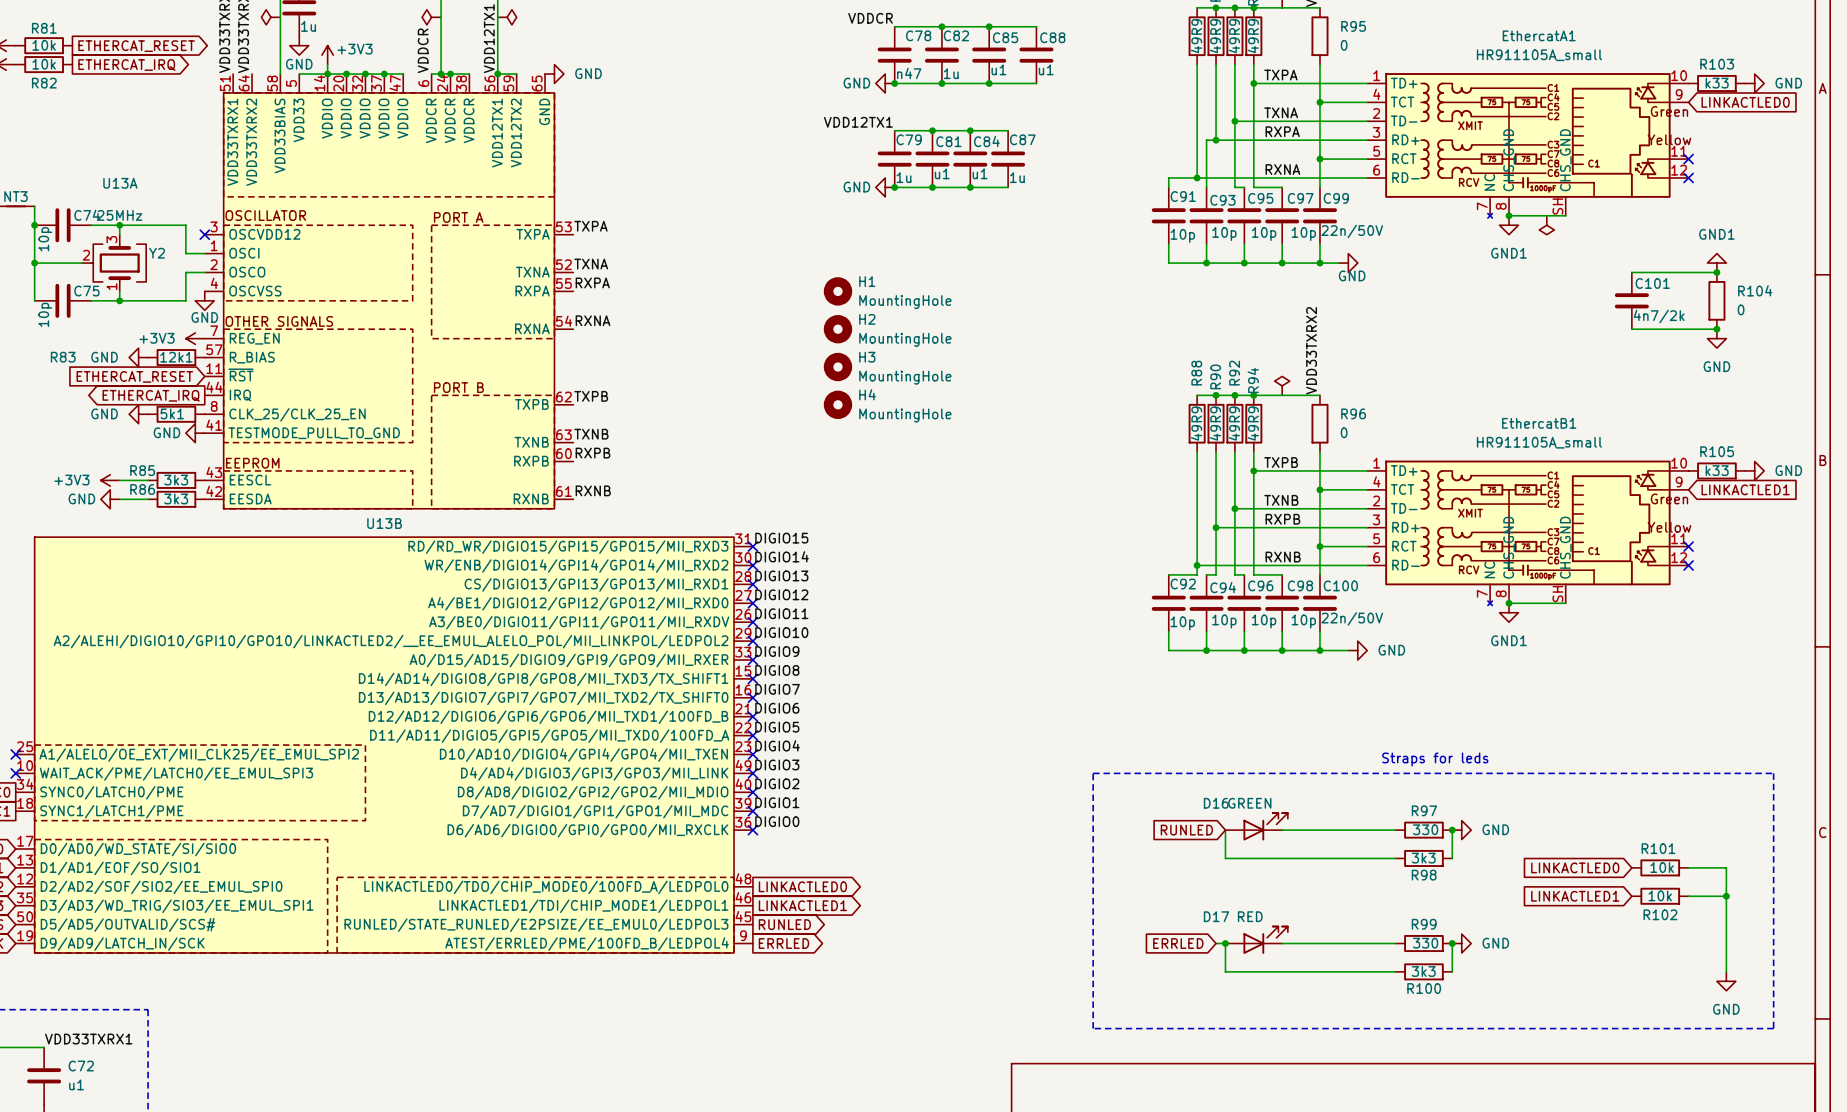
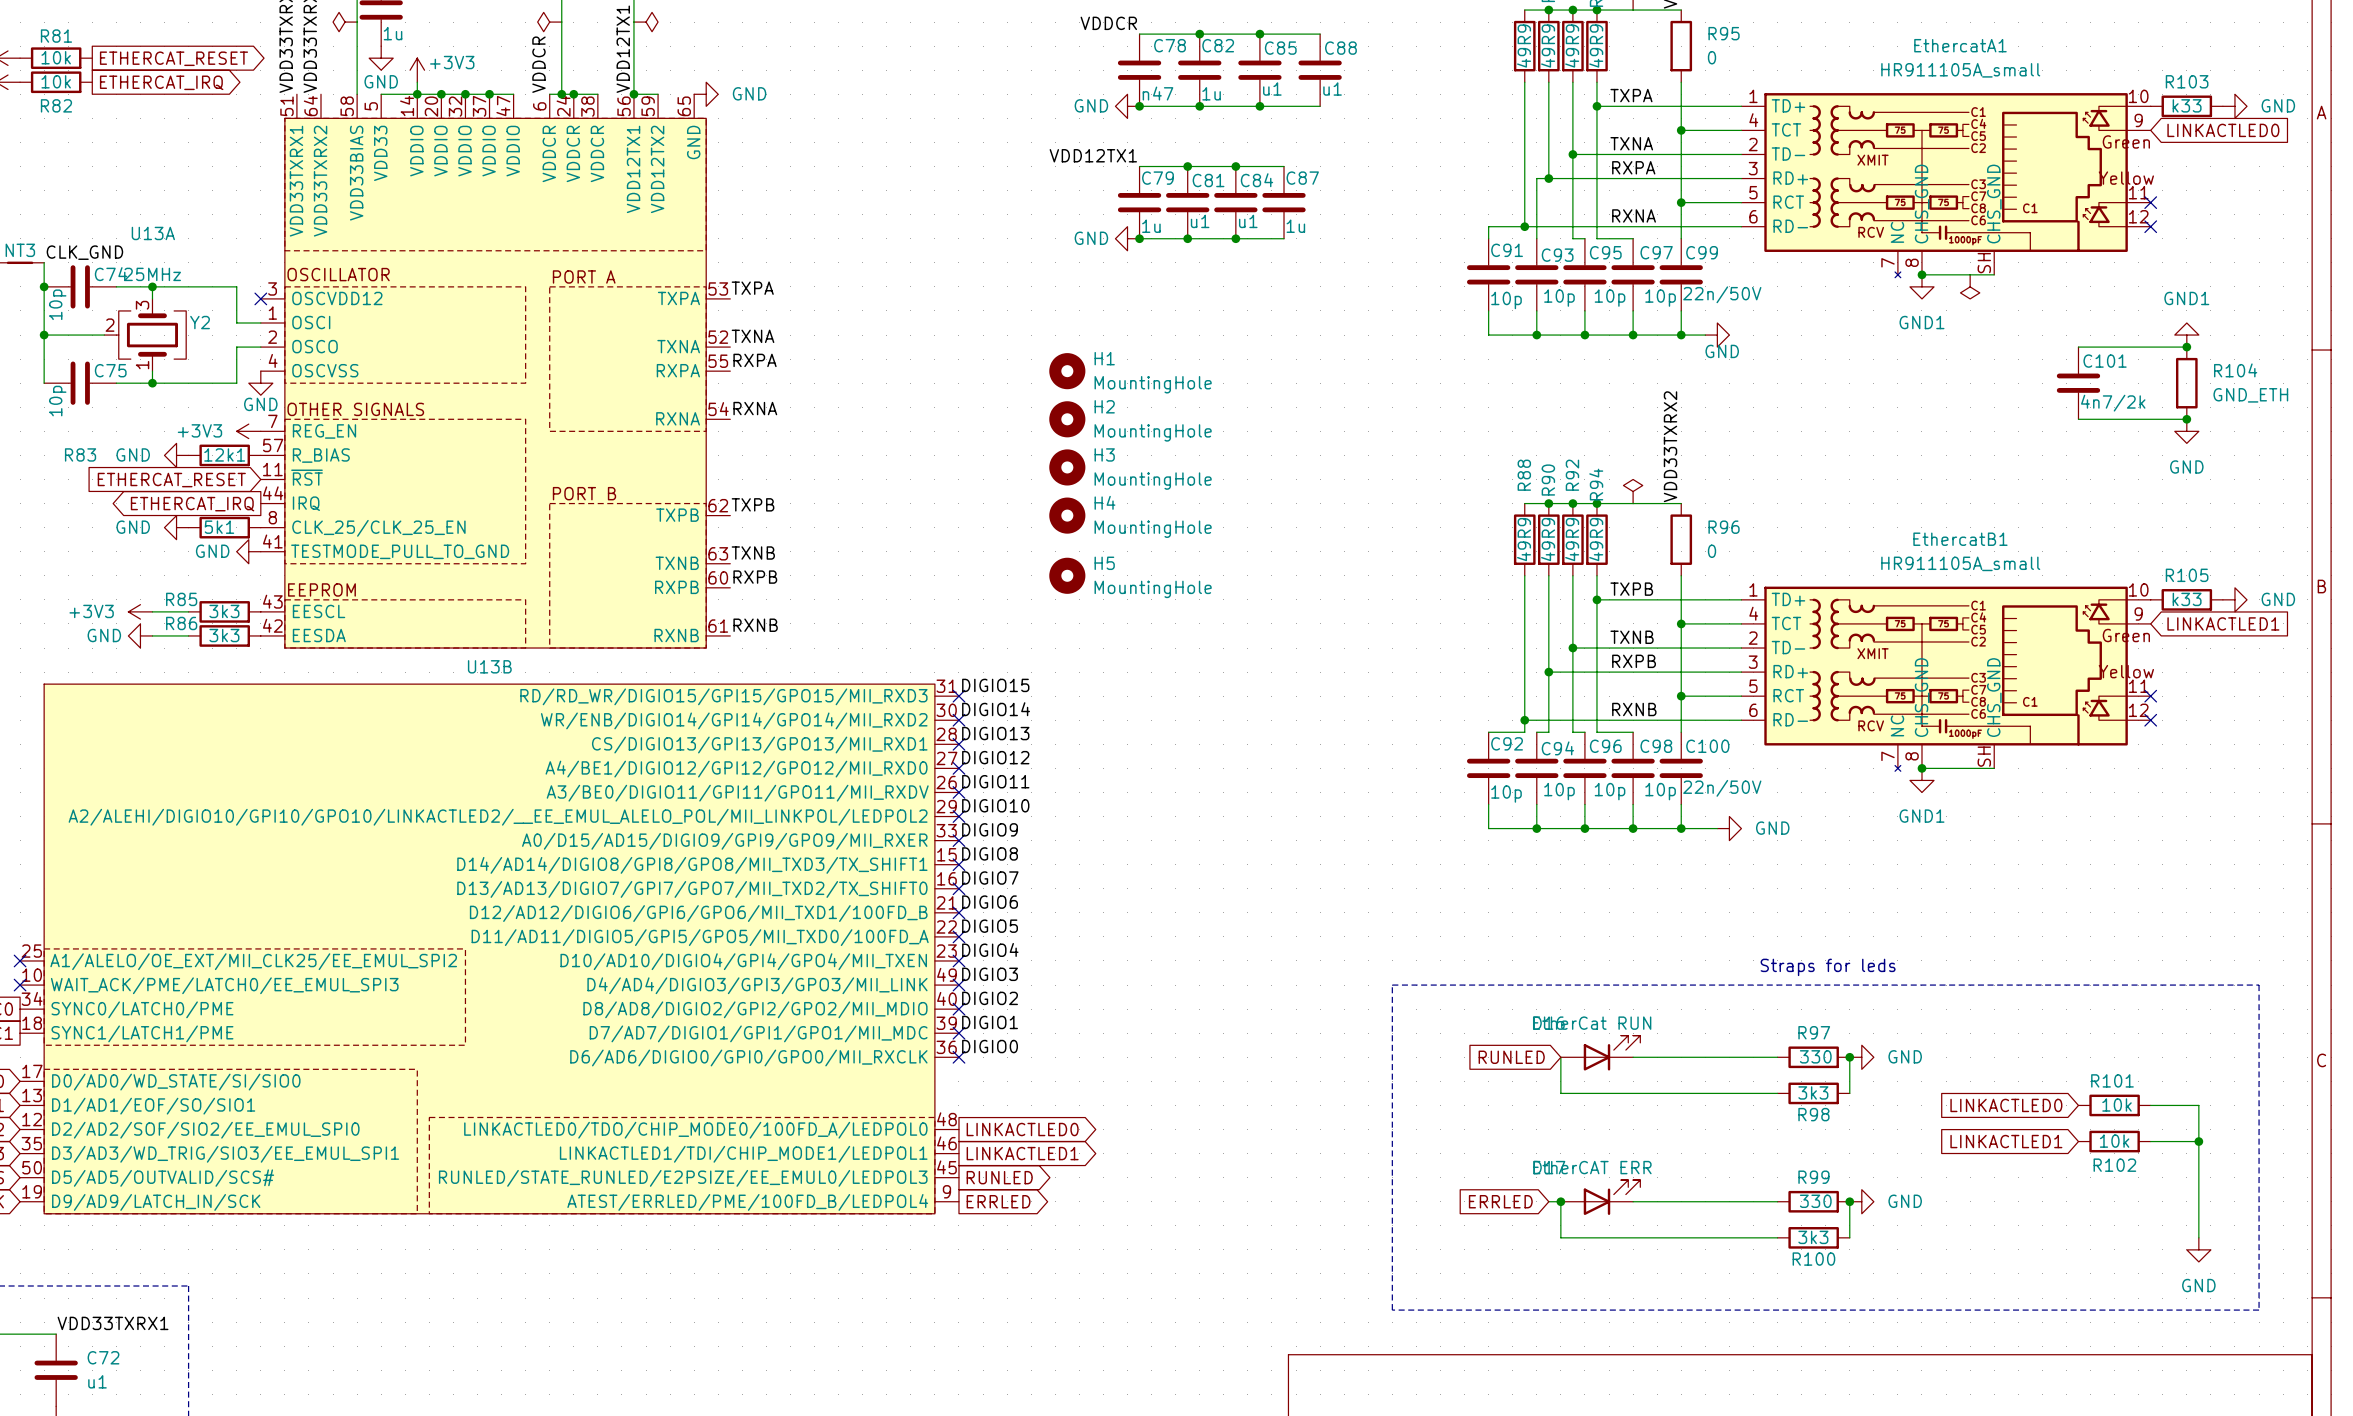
label: none -> CLK_GND (84, 252)
R104 value: 0 (1741, 309) -> GND_ETH (2250, 395)
H5: none -> MountingHole (1067, 575)
D16 value: GREEN (1249, 803) -> EtherCat RUN (1592, 1023)
D17 value: RED (1250, 916) -> EtherCAT ERR (1592, 1167)

